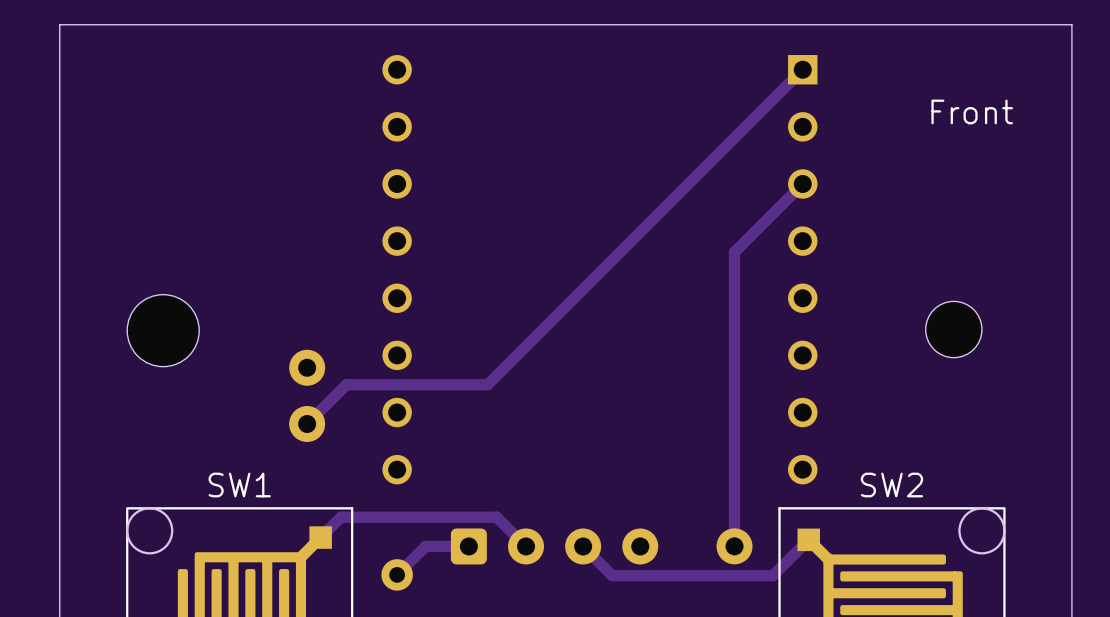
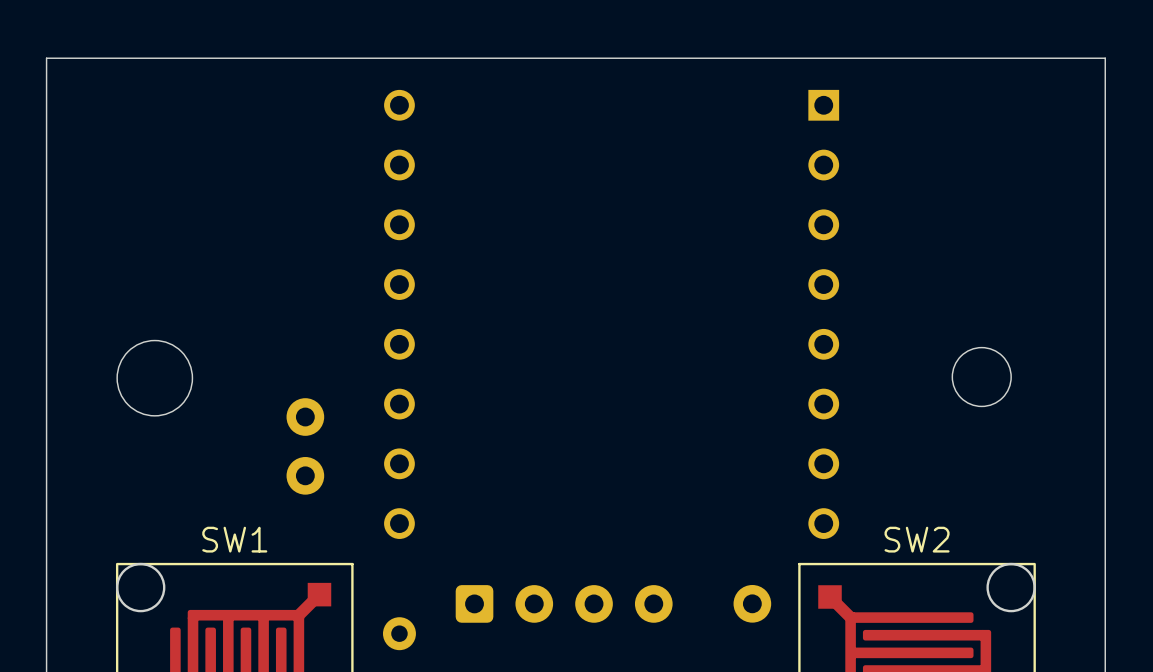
track: (802, 69) (487, 384) (346, 384) (307, 423) -> none
text: Front (972, 111) -> none
track: (802, 183) (734, 252) (734, 546) -> none
track: (320, 537) (341, 517) (496, 517) (526, 546) -> none
track: (808, 539) (772, 575) (612, 575) (583, 546) -> none
track: (468, 546) (425, 546) (397, 574) -> none

